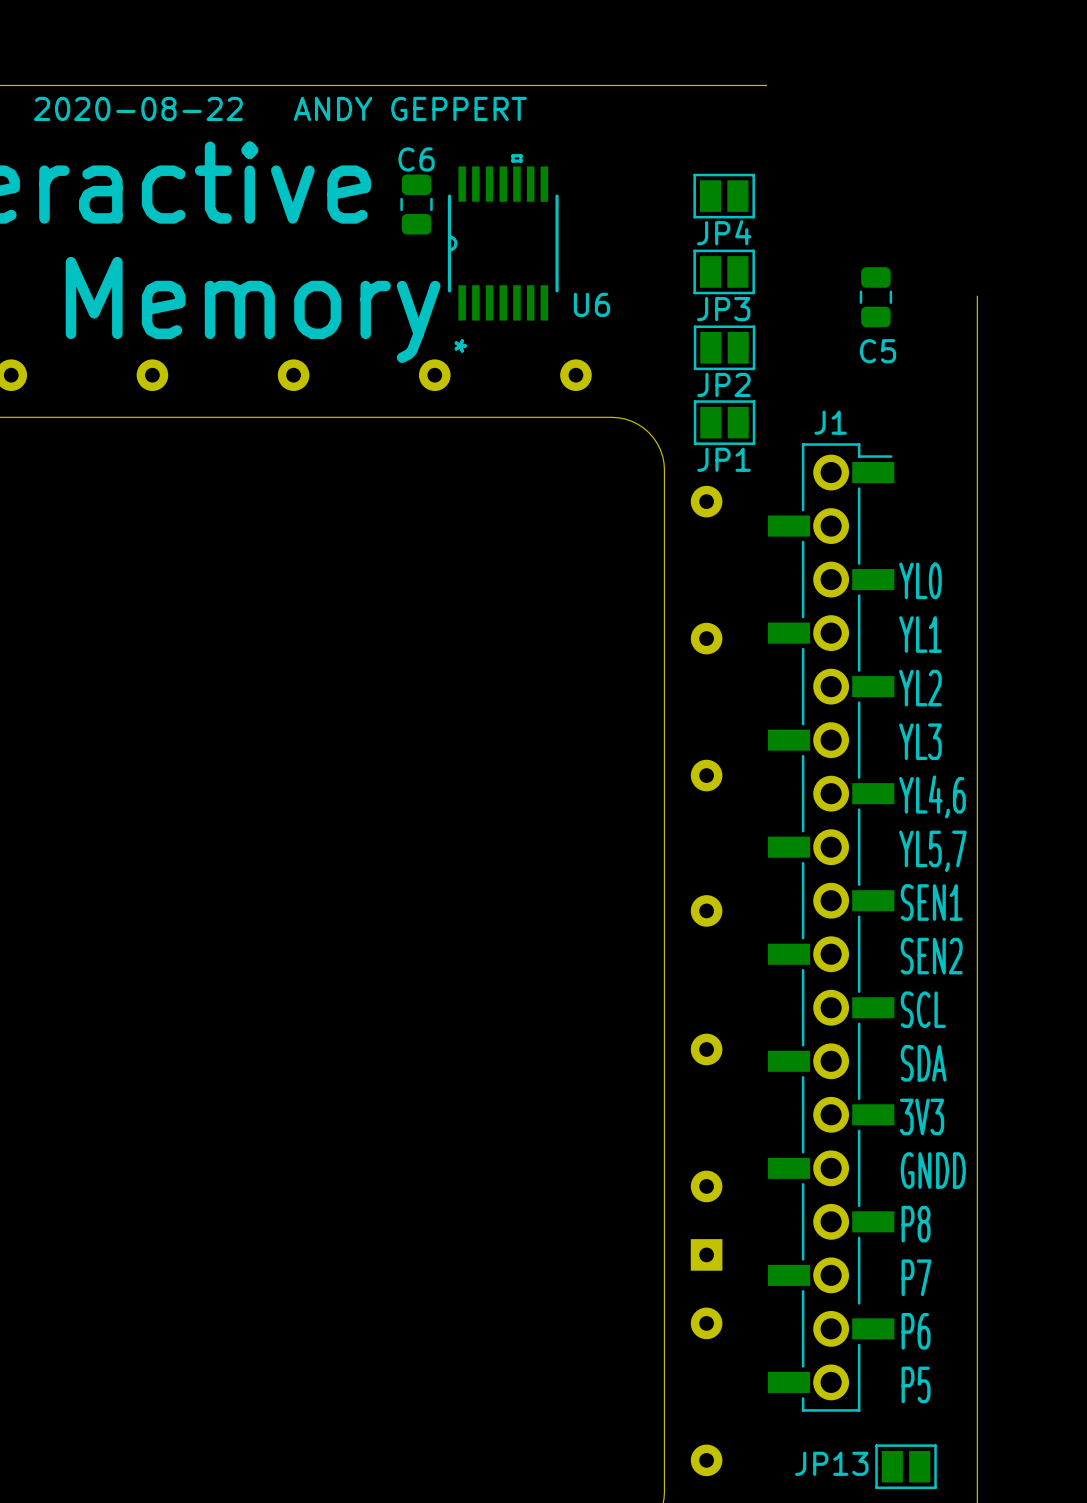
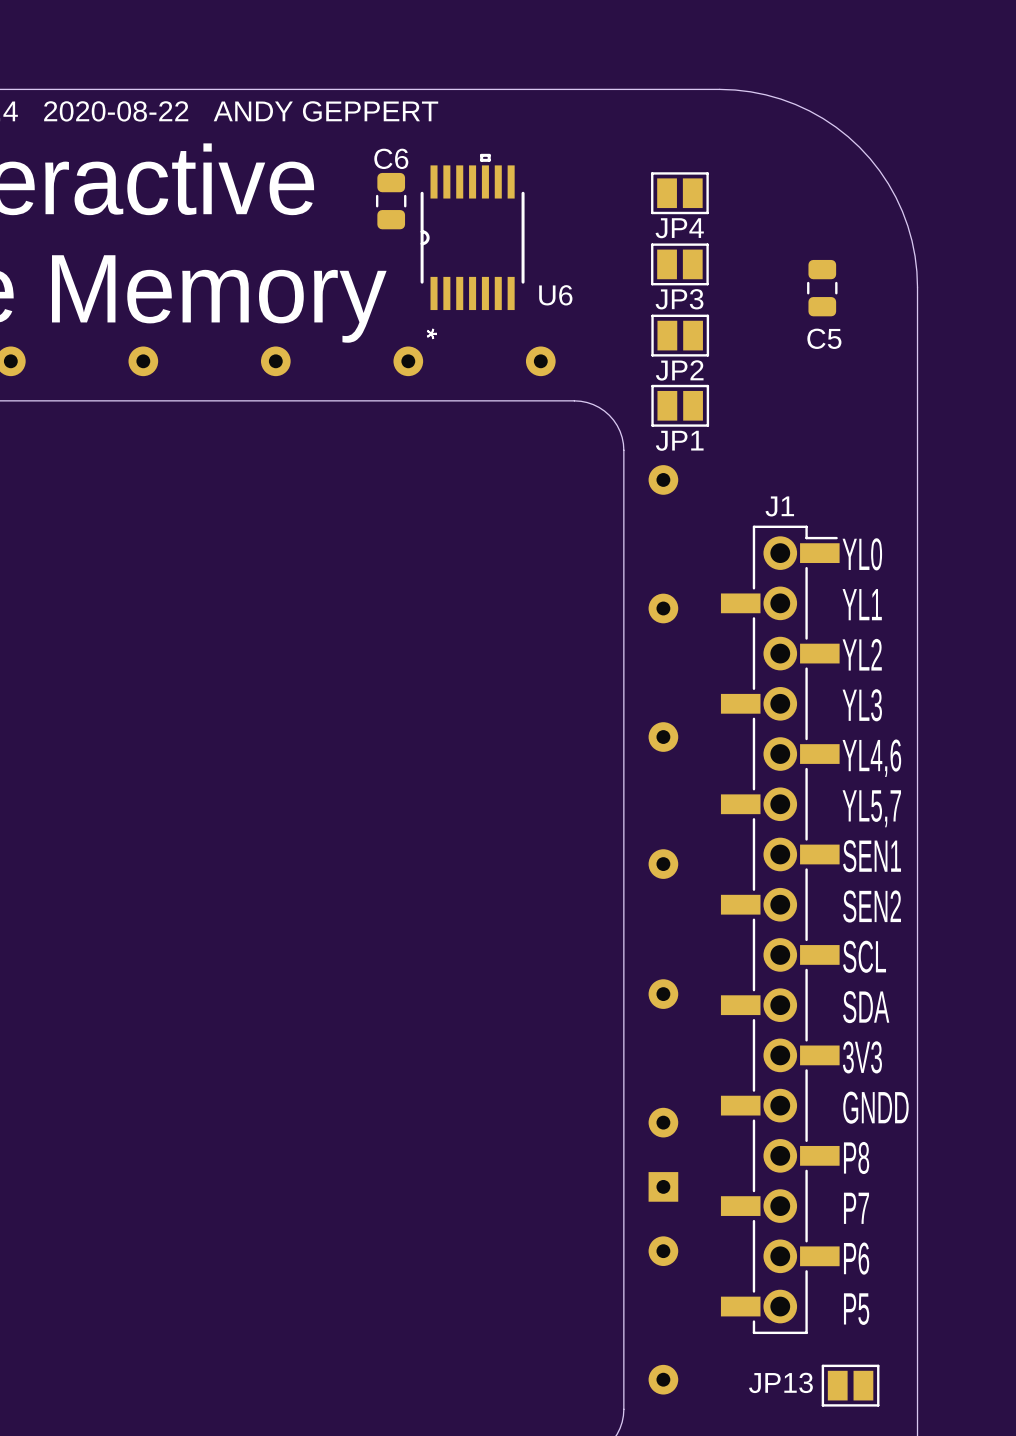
board edge: none -> (719, 89) (750, 91) (795, 104) (835, 127) (859, 147) (879, 170) (902, 211) (915, 256) (917, 287)
J1 name position: J1 (830, 422) -> J1 (779, 506)
J1 footprint: [767, 443, 895, 1412] -> [720, 525, 840, 1335]

